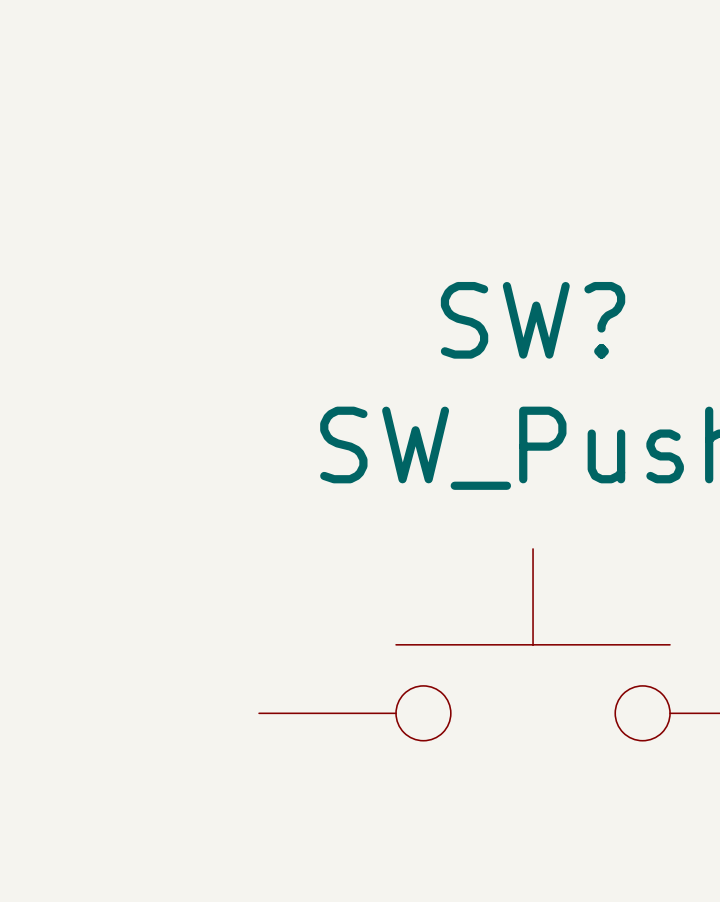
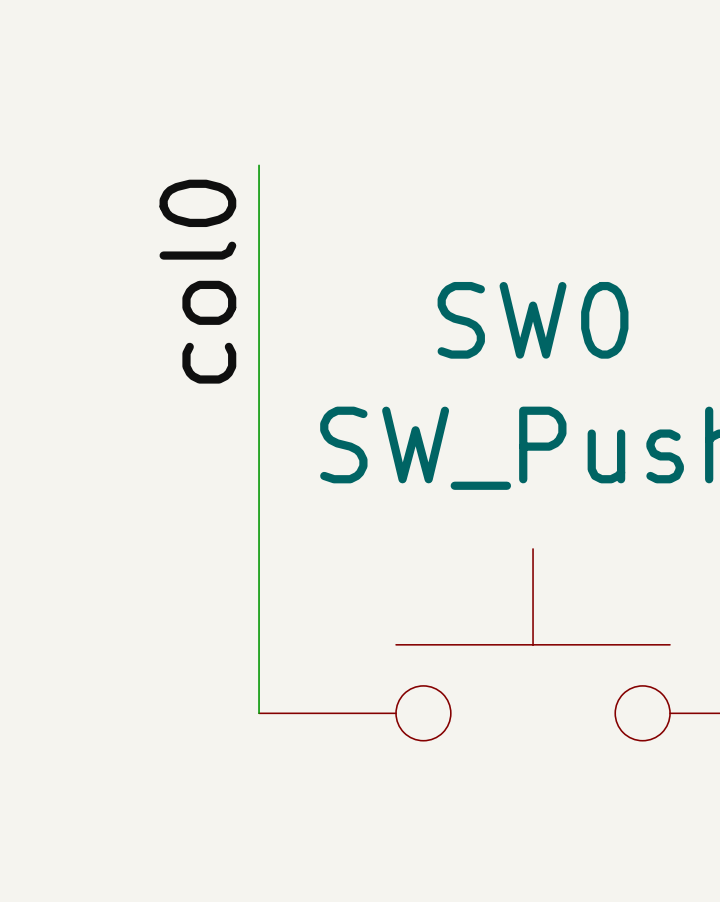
wire: none -> (259, 165) (259, 713)
label: none -> col0 (197, 281)
SW? name: SW? (533, 320) -> SW0 (533, 320)

